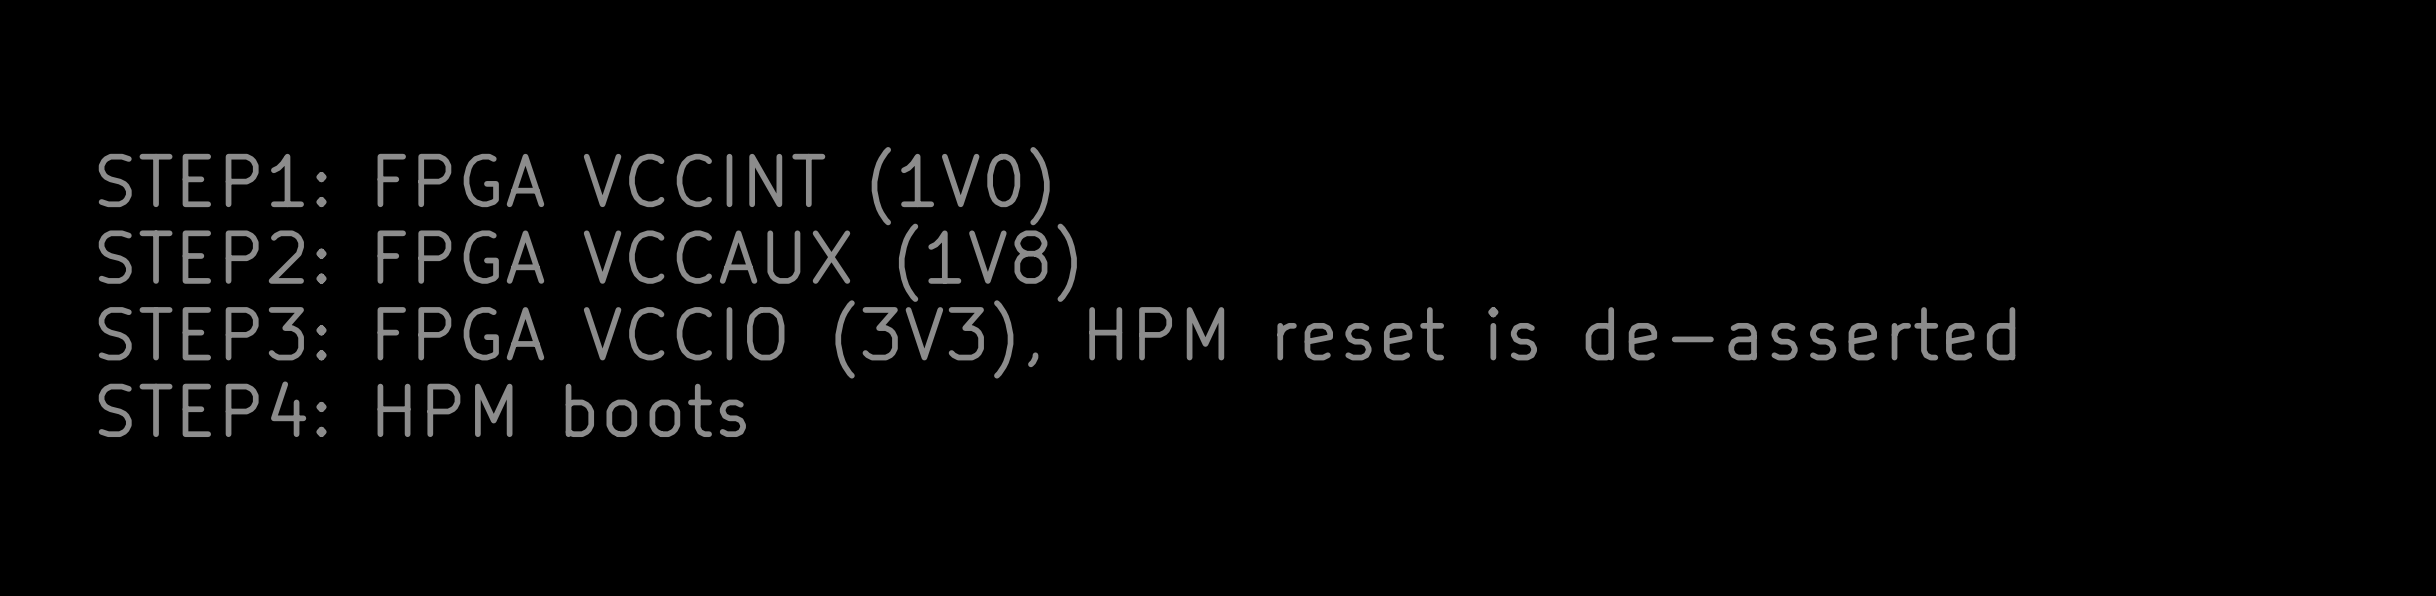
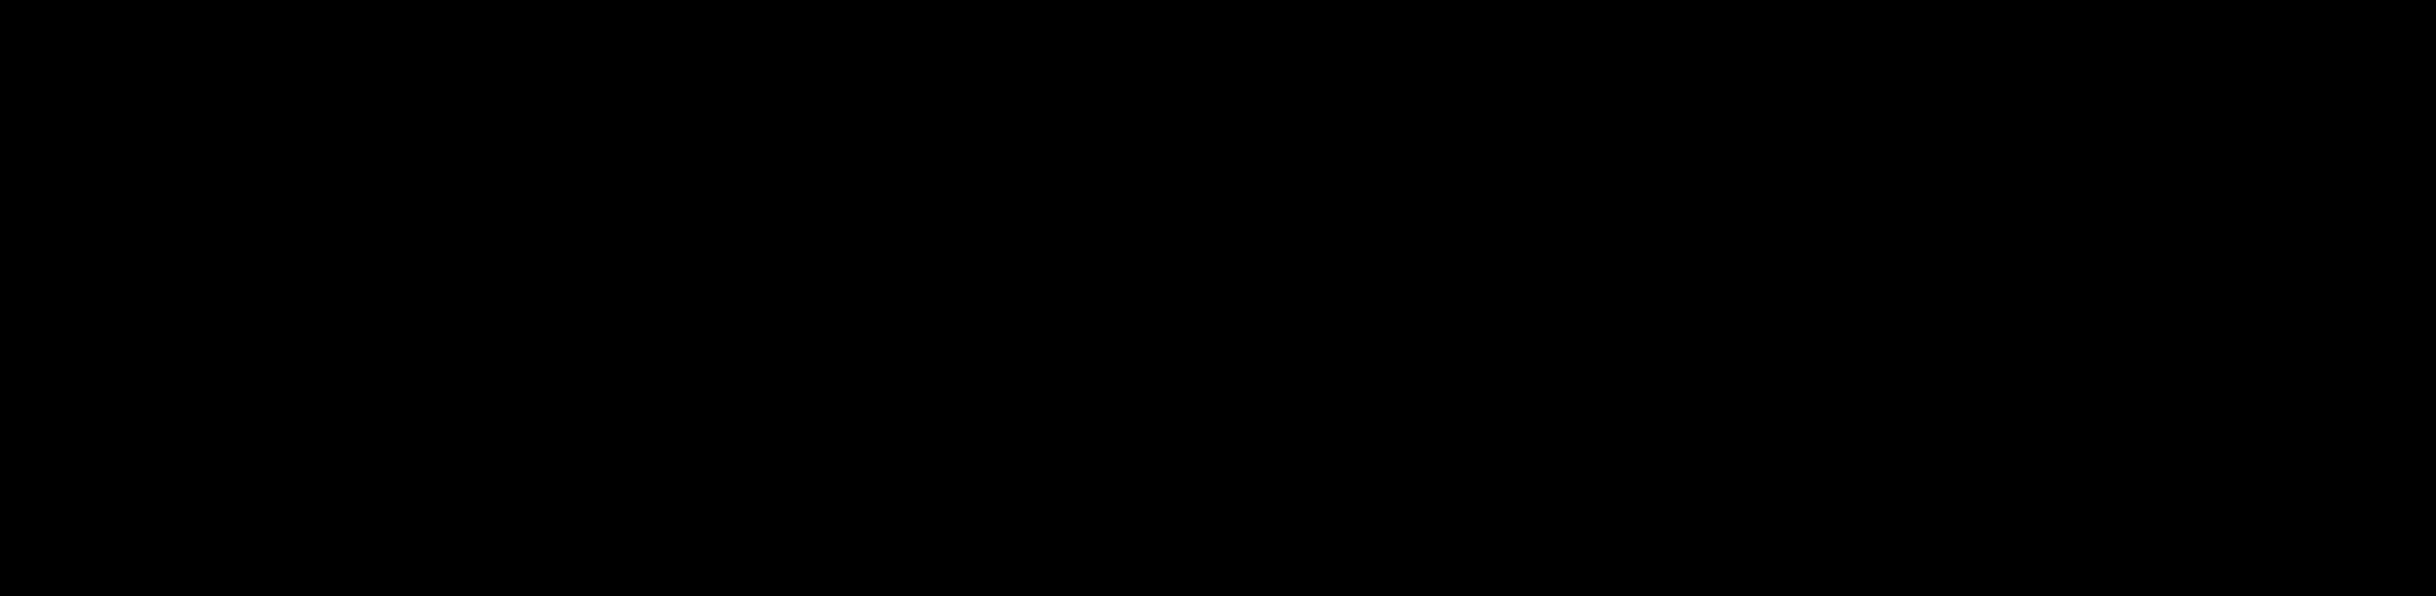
text: STEP1: FPGA VCCINT (1V0) (574, 186) -> none
text: STEP2: FPGA VCCAUX (1V8) (587, 262) -> none
text: STEP3: FPGA VCCIO (3V3), HPM reset is de-asserted (1057, 339) -> none
text: STEP4: HPM boots (422, 409) -> none

